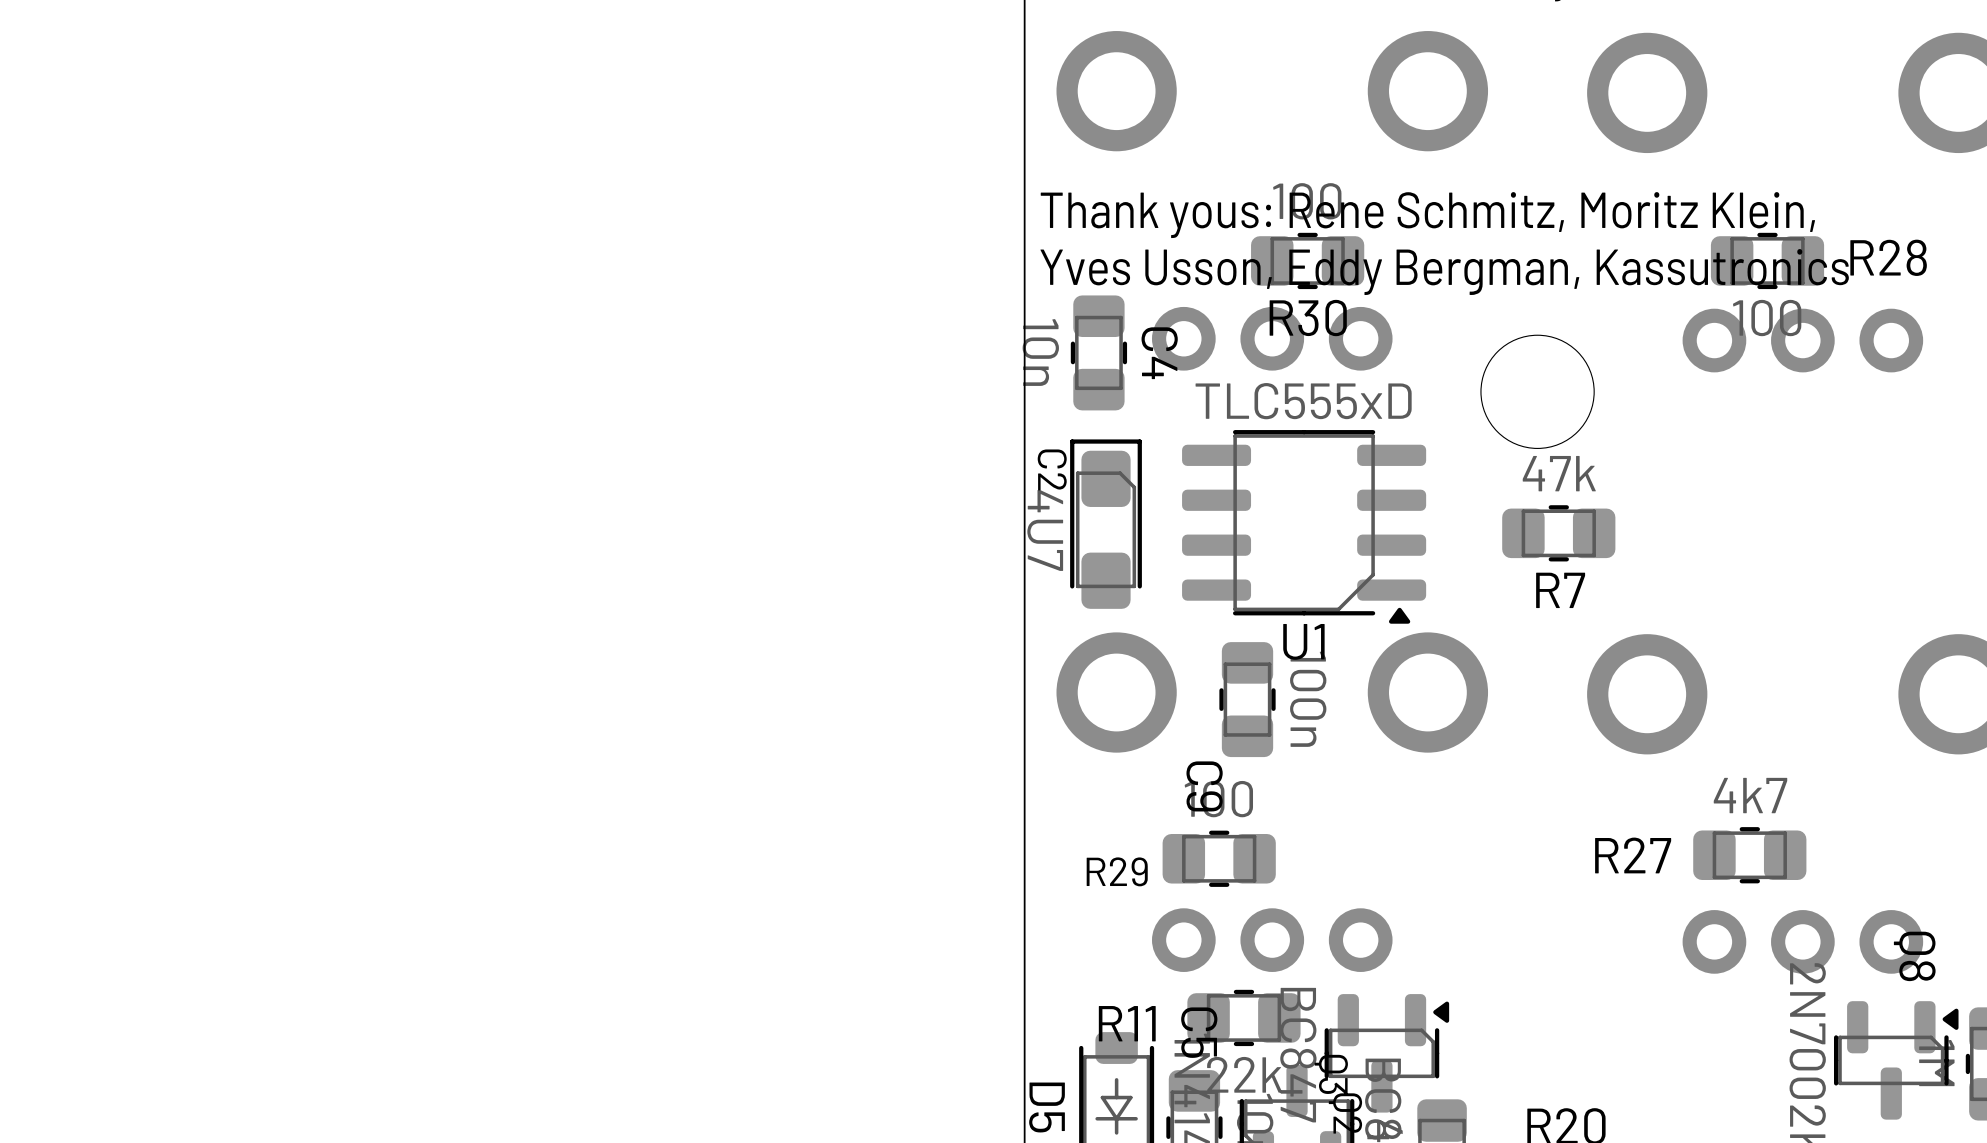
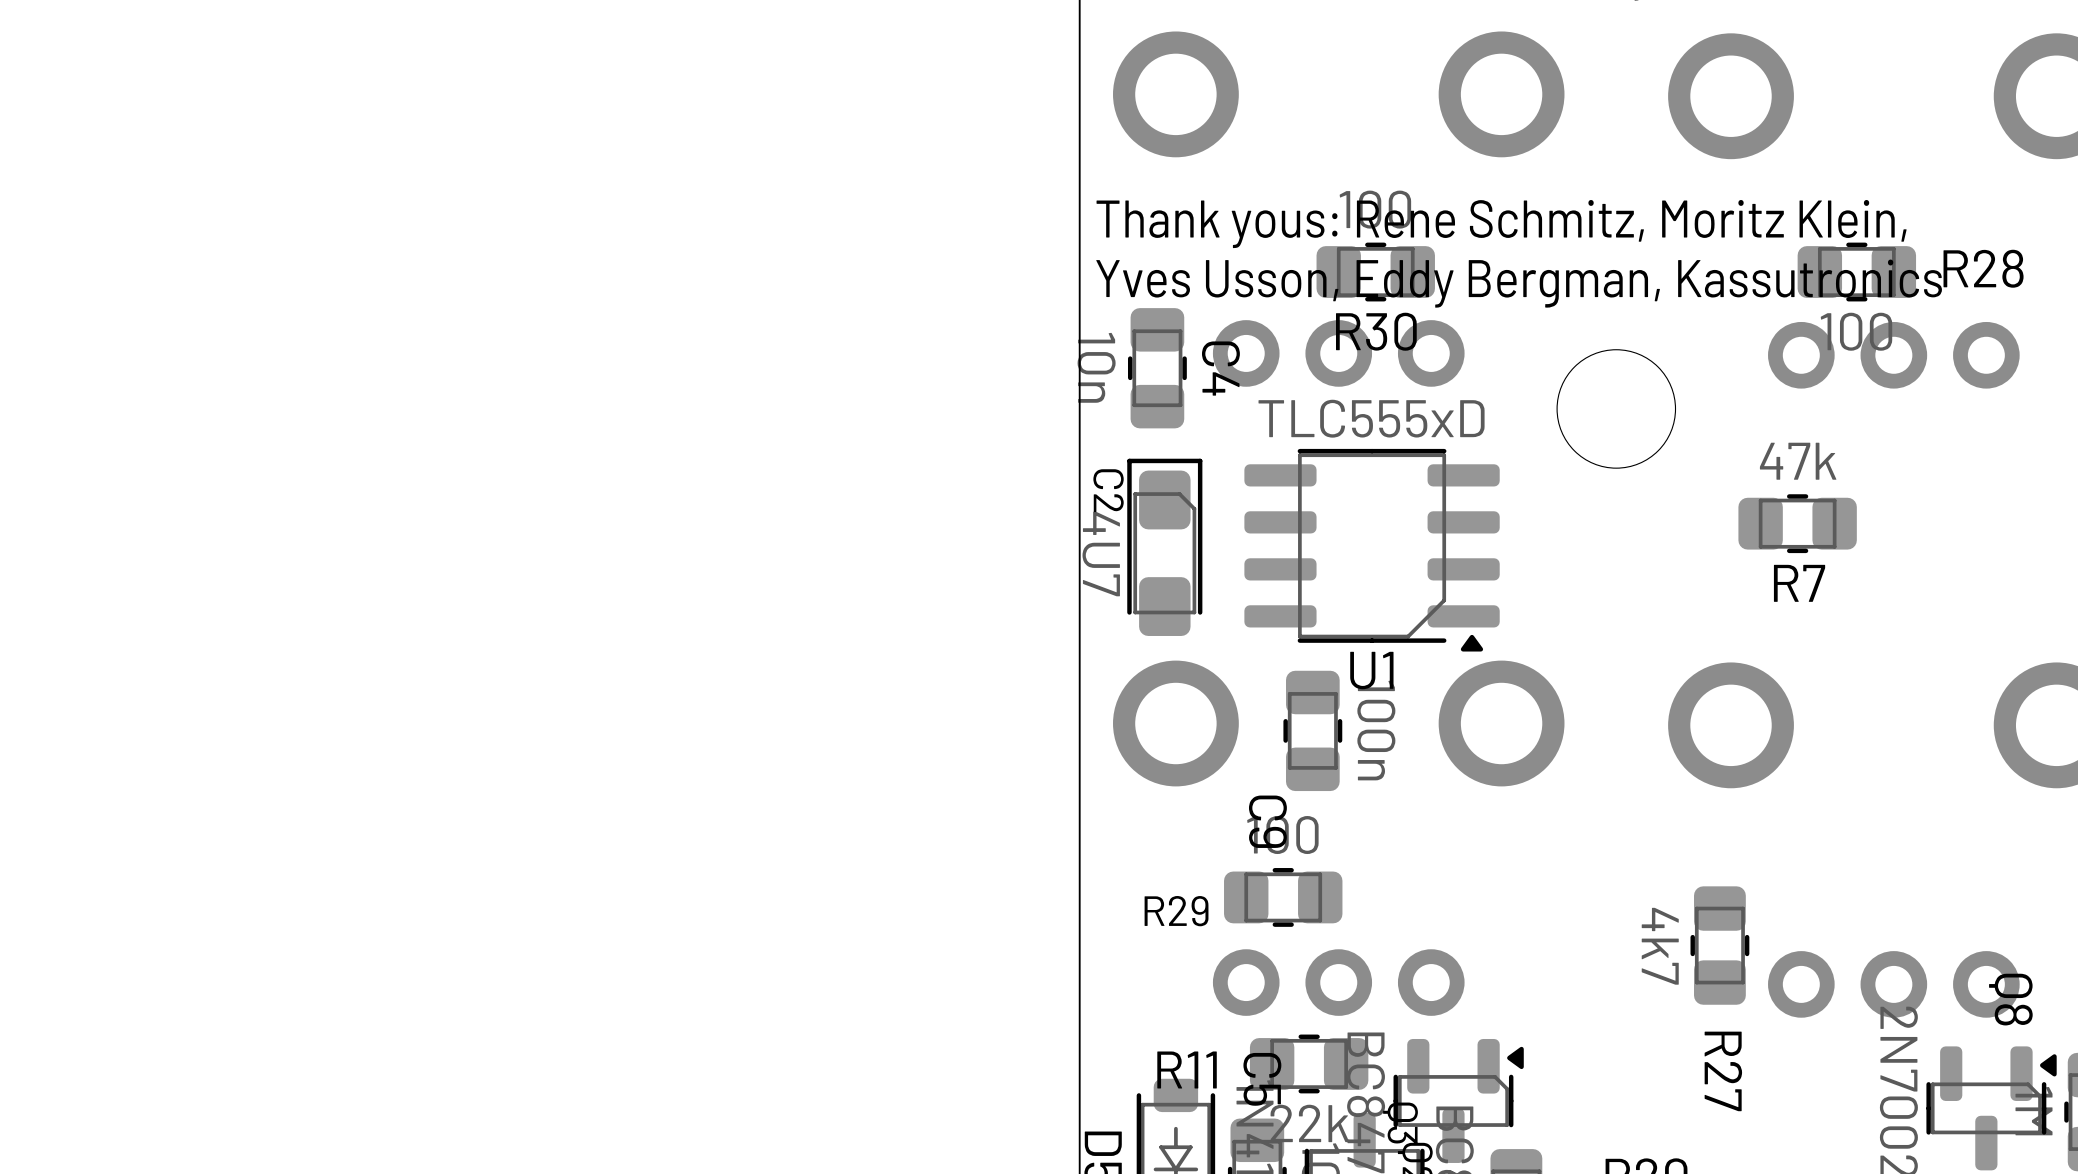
R7 position: (1558, 533) -> (1797, 523)
R27 value position: 4k7 (1750, 795) -> 4k7 (1660, 946)
R27 name position: R27 (1633, 855) -> R27 (1723, 1071)
R27 rotation: 0° (1749, 855) -> 90° clockwise (1719, 945)
R27 position: (1749, 855) -> (1719, 945)

